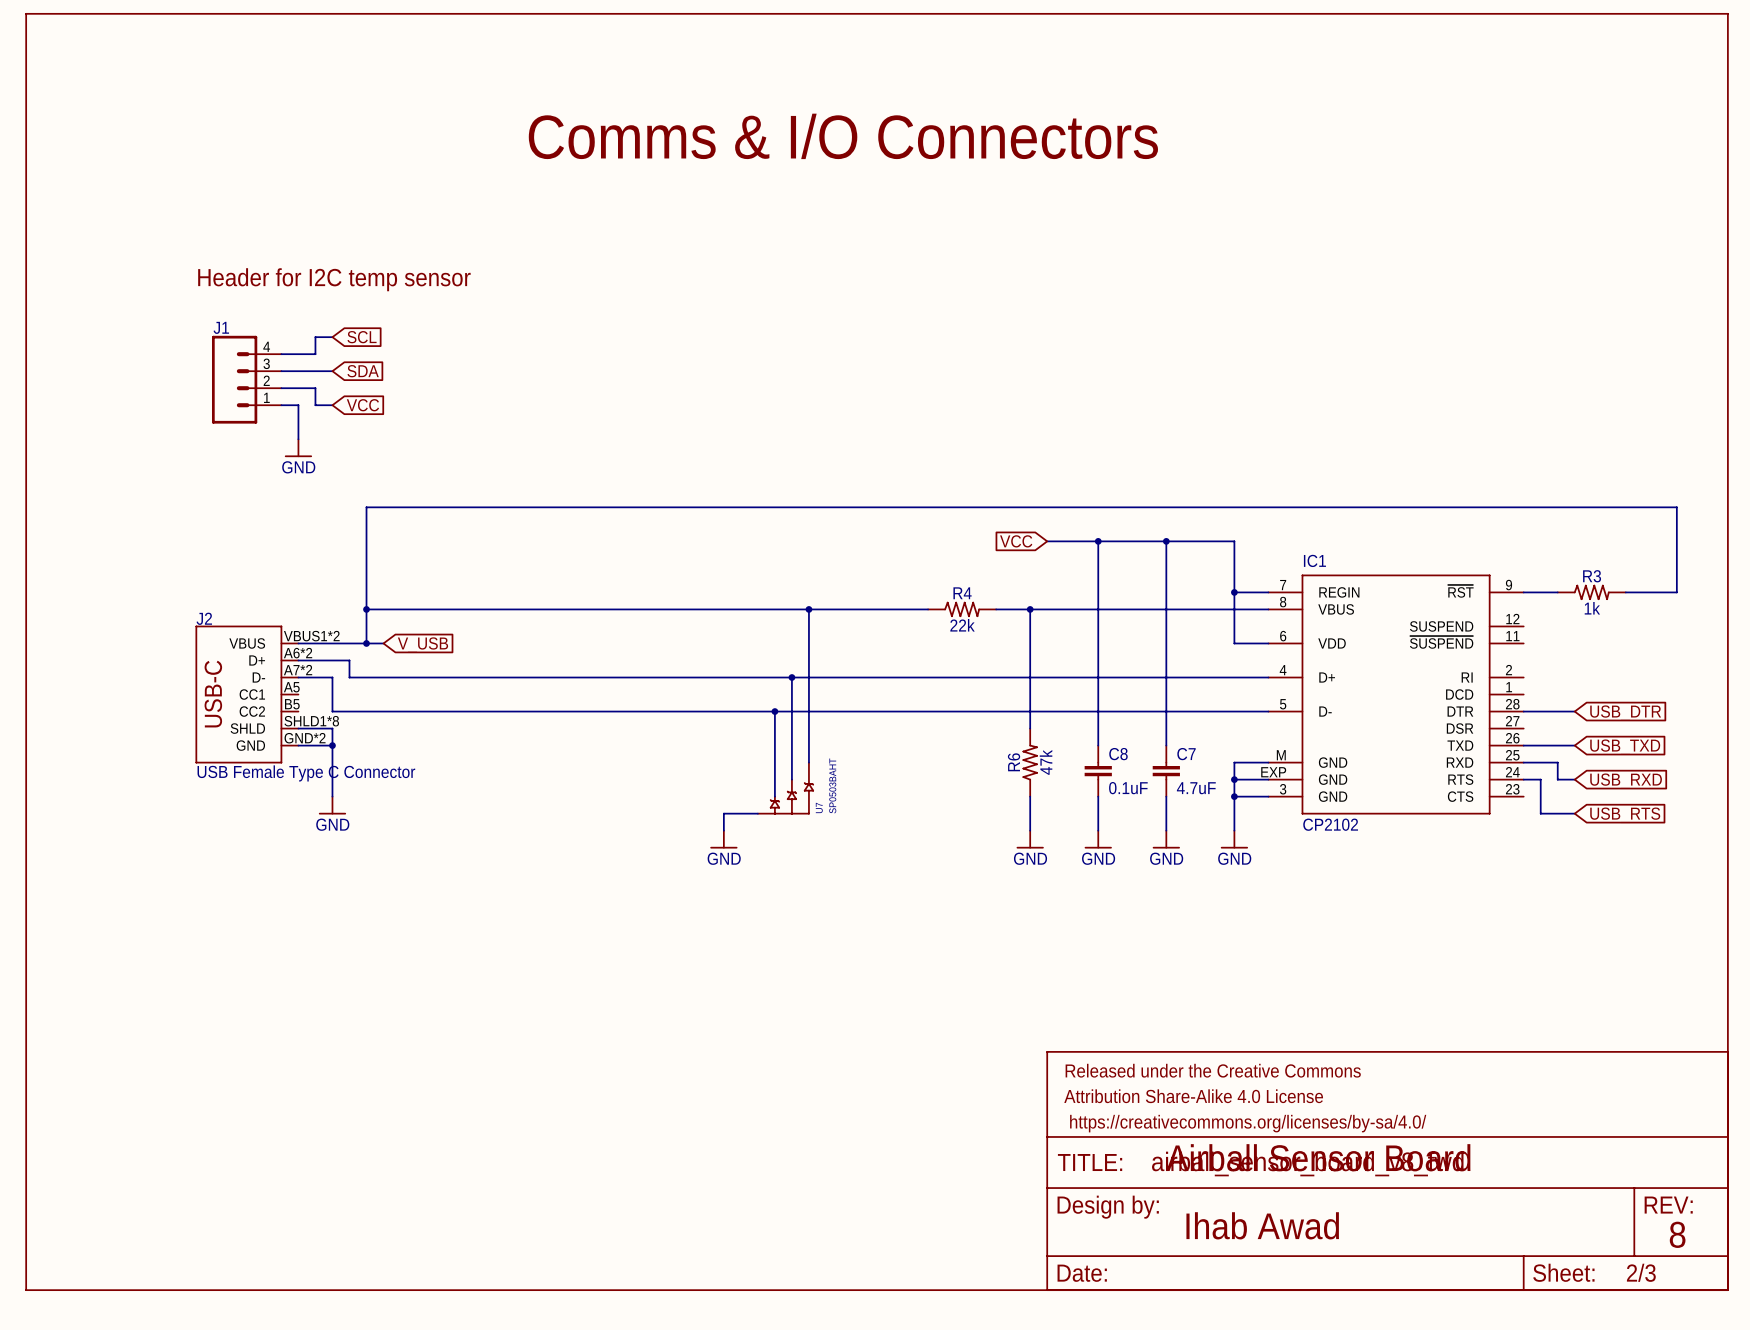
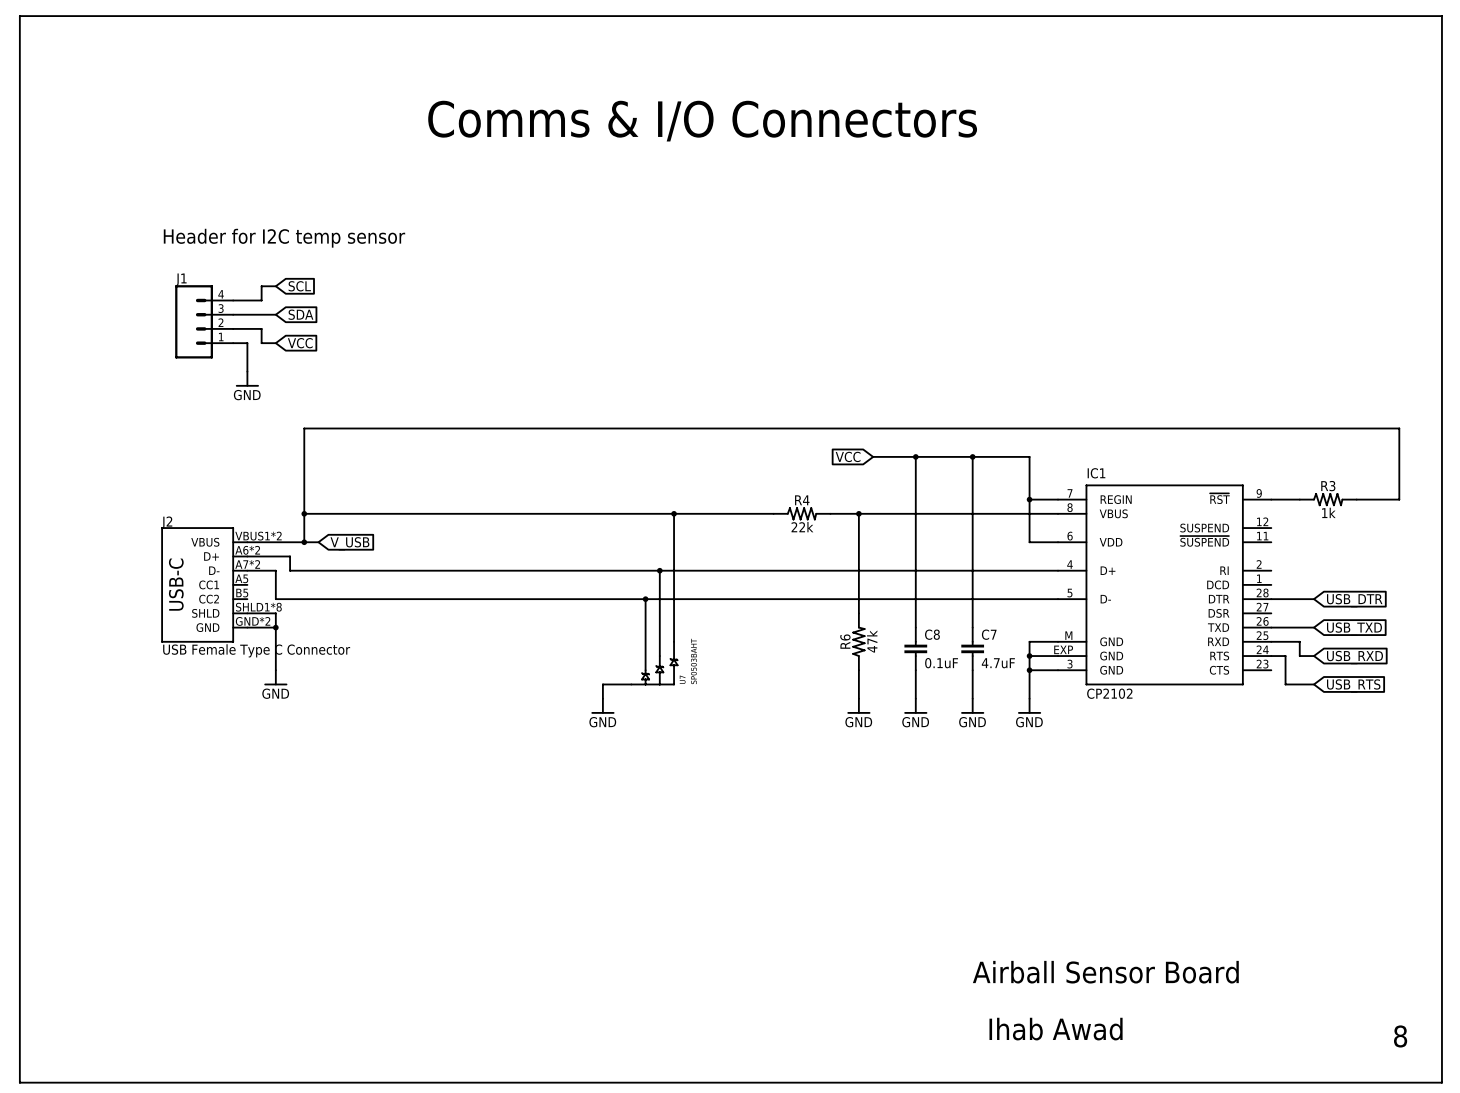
part: (1387, 1171) -> none

